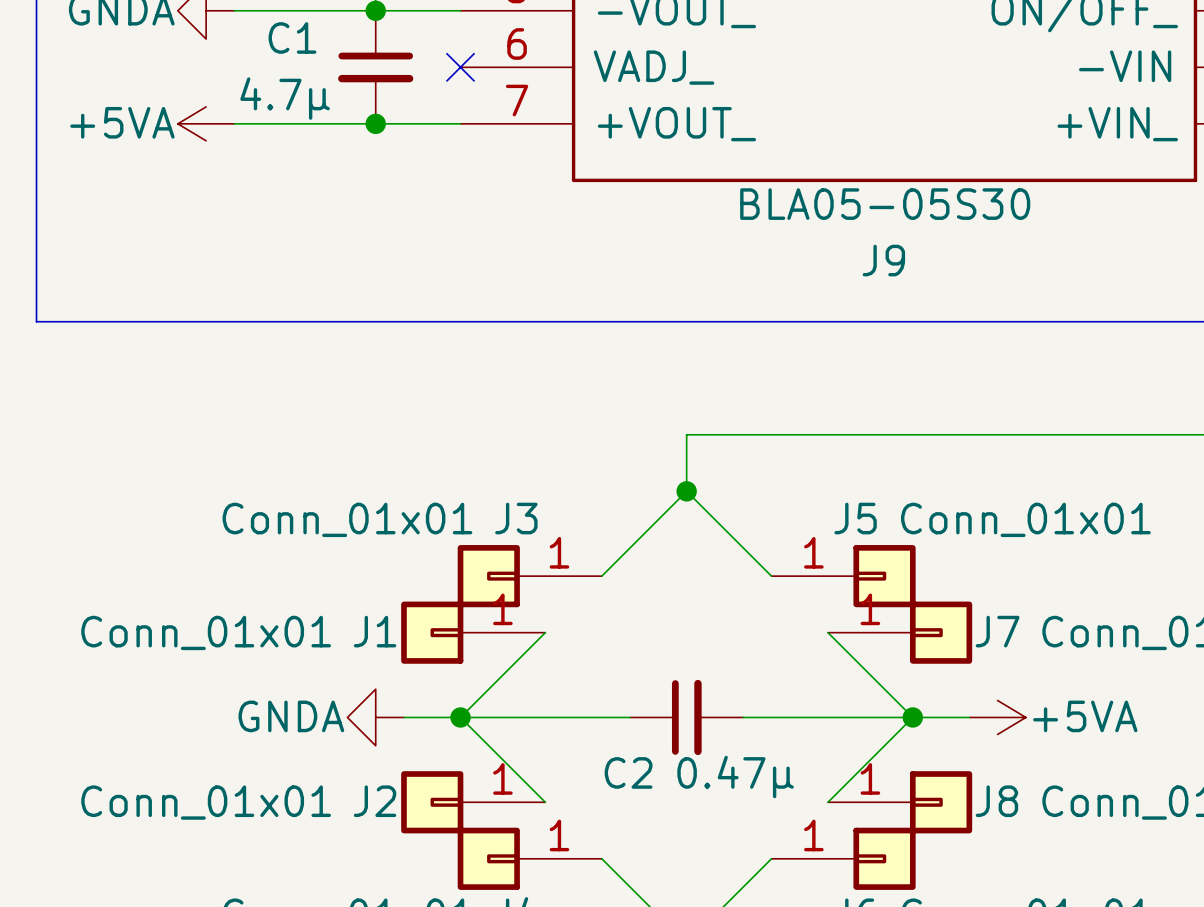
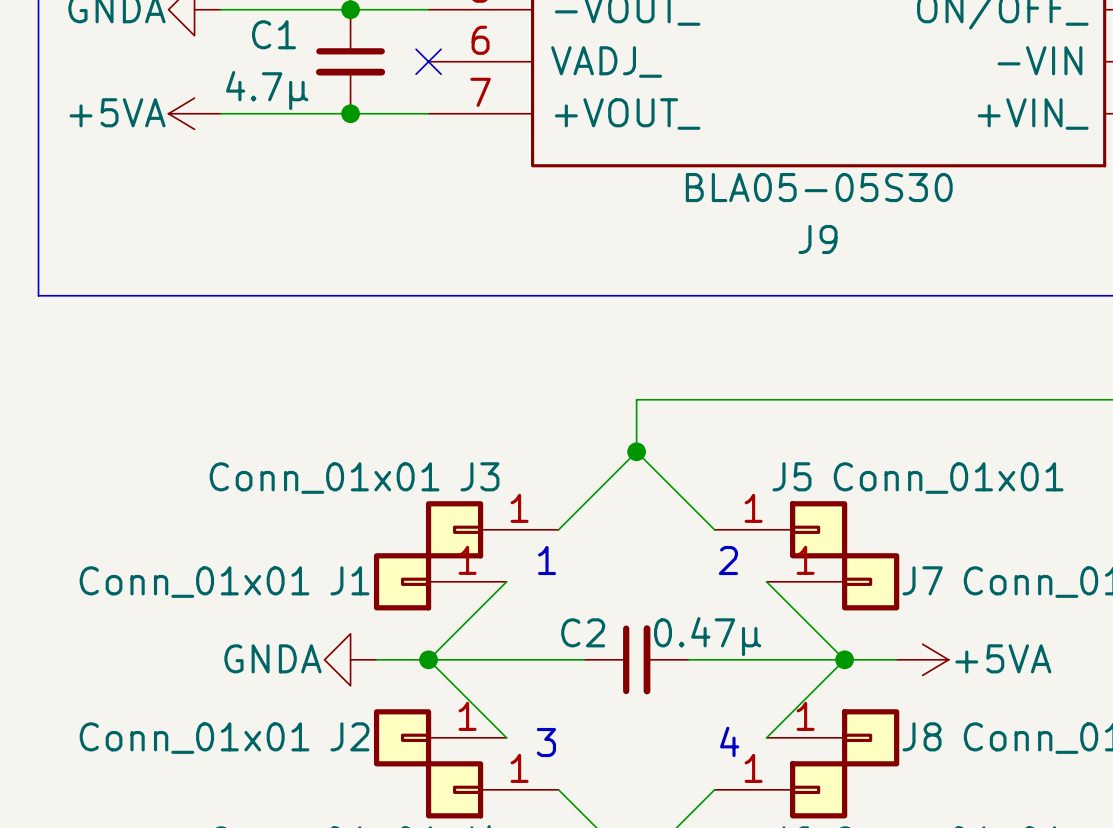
text: none -> 1 (547, 560)
text: none -> 2 (728, 560)
C2 name position: C2 (628, 772) -> C2 (583, 632)
C2 value position: 0.47μ (735, 776) -> 0.47μ (707, 636)
text: none -> 4 (729, 741)
text: none -> 3 (546, 742)

